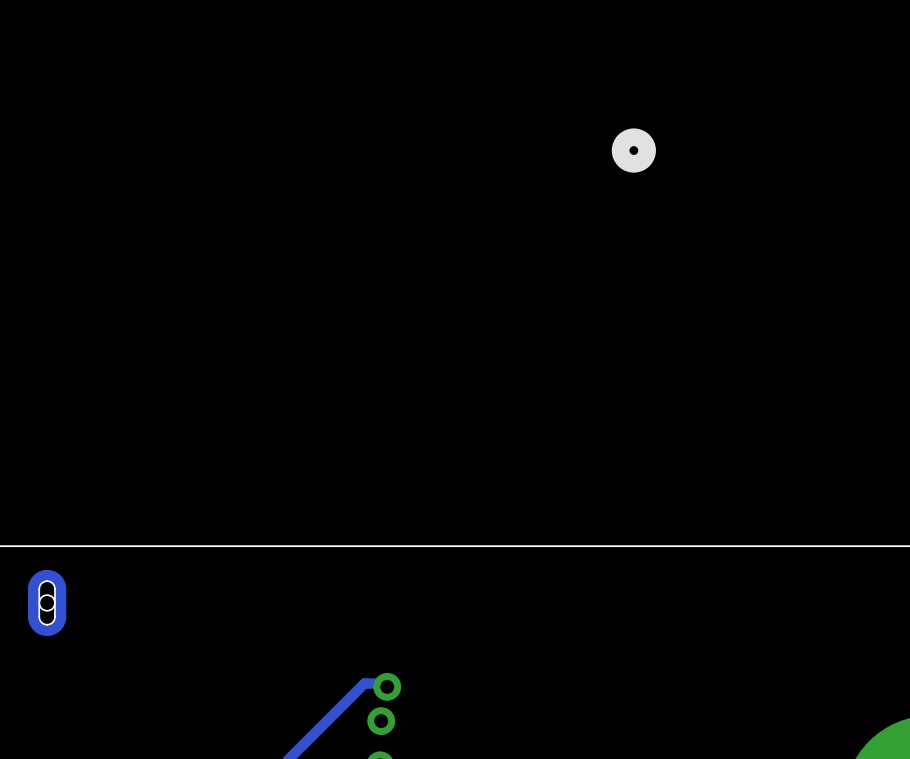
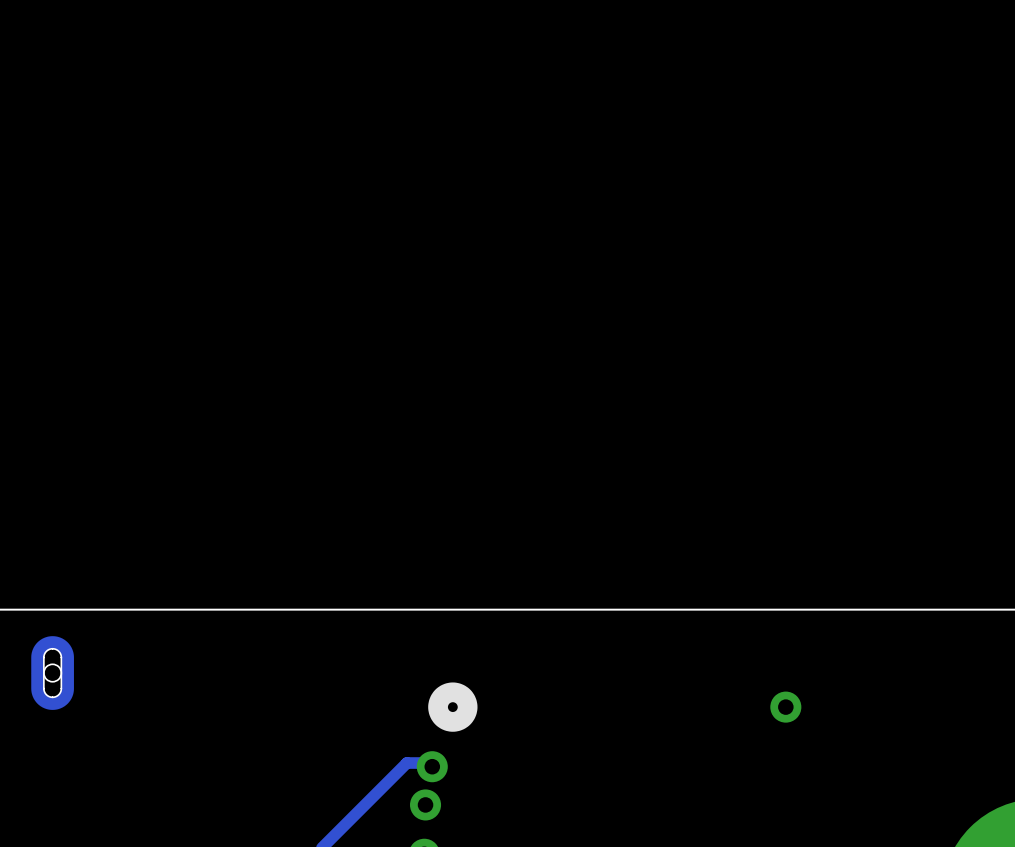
part position: (633, 150) -> (452, 707)
via: none -> (785, 707)

